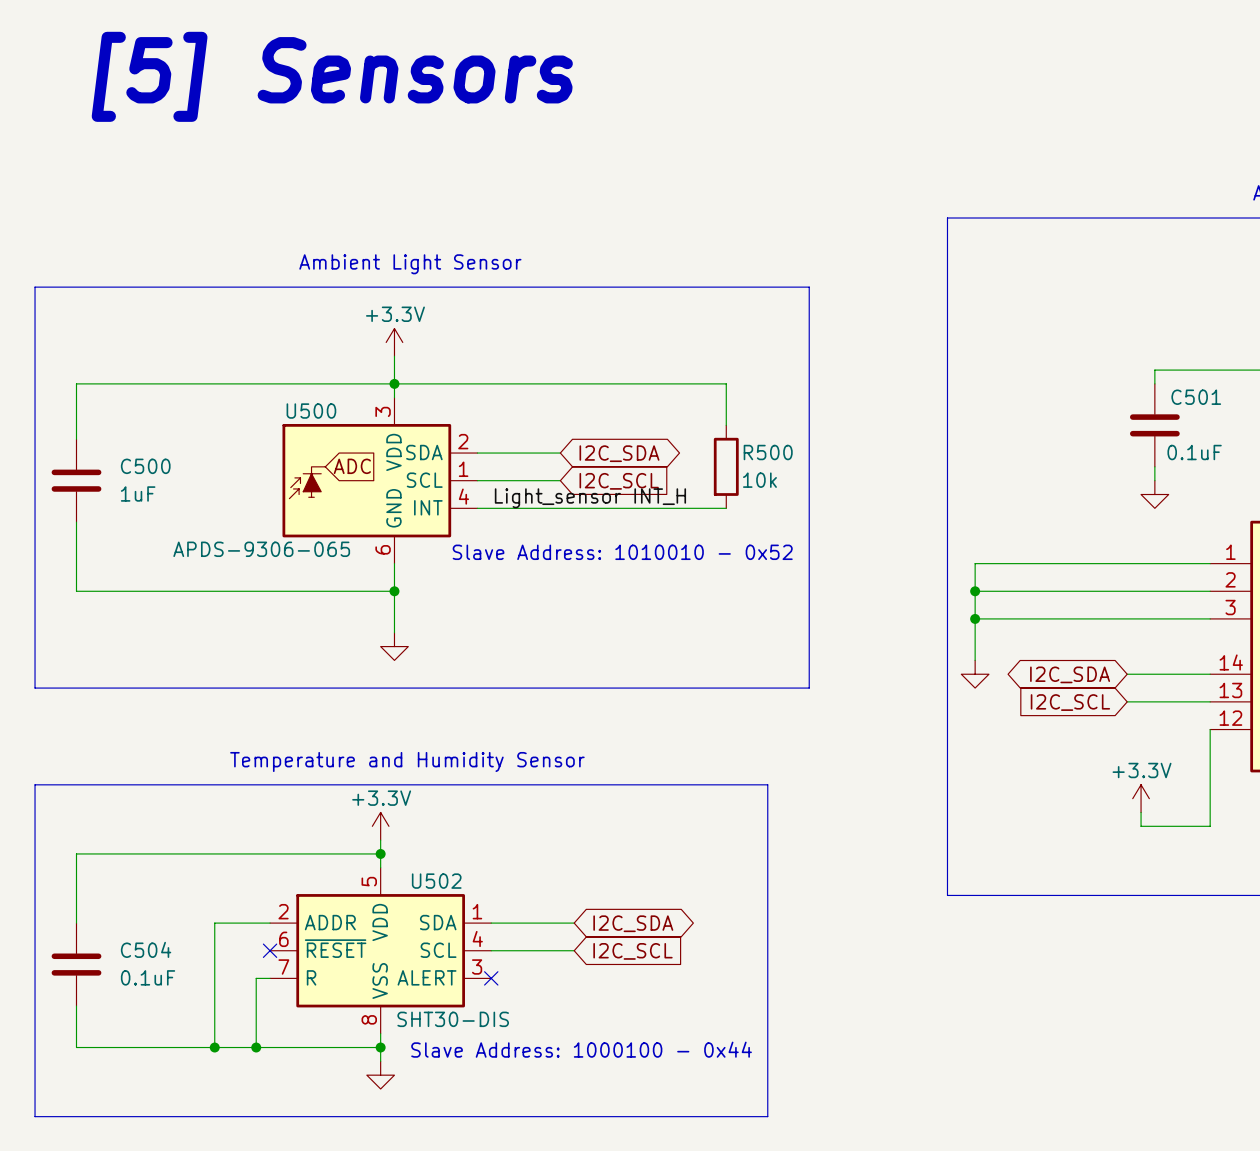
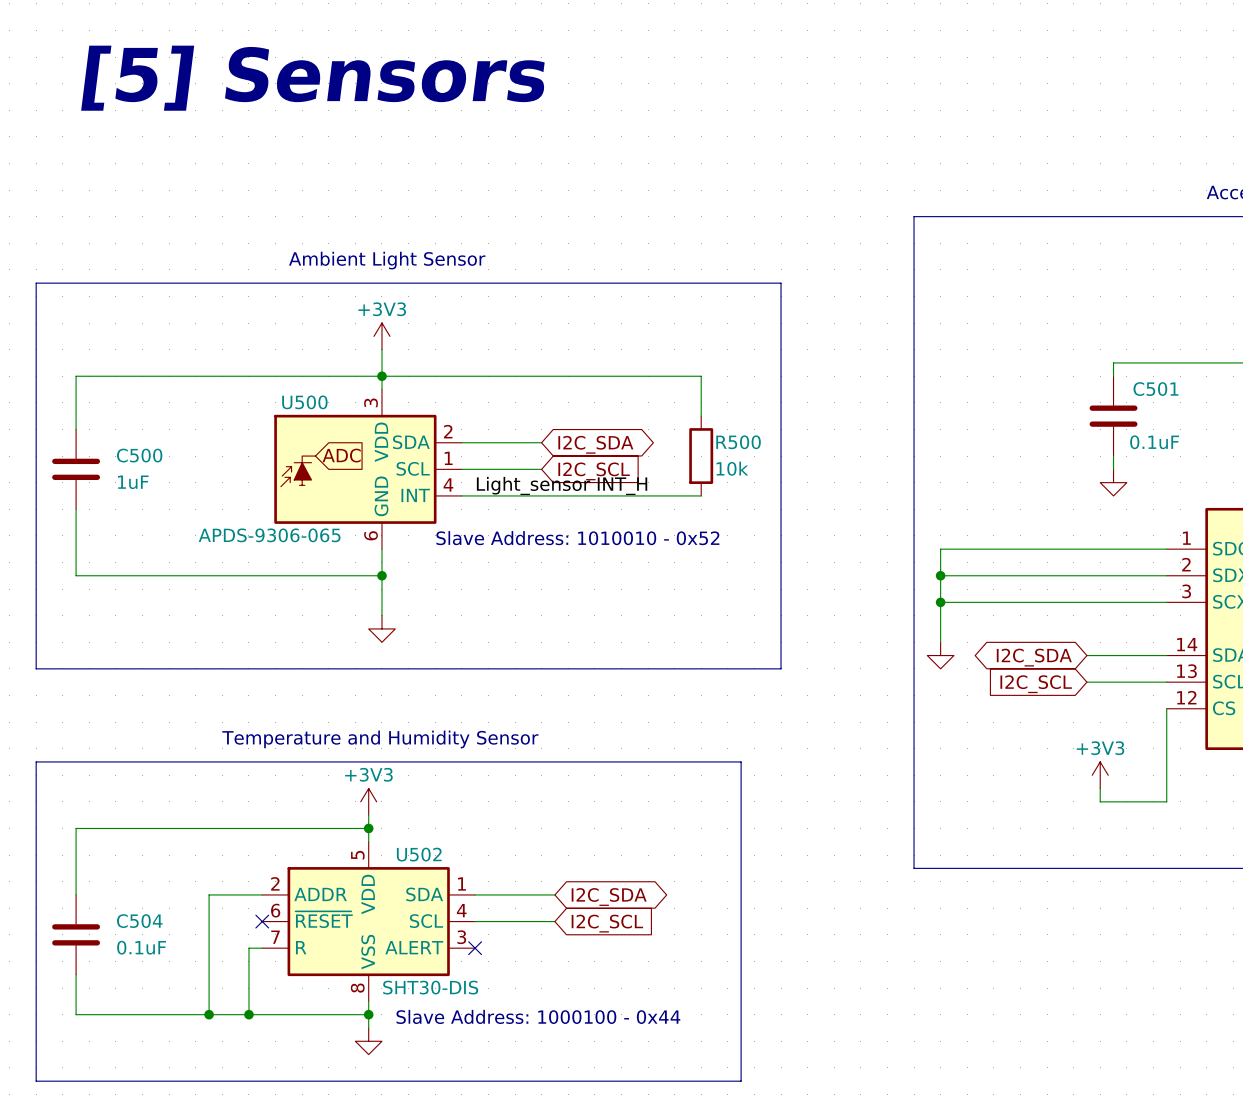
power symbol: +3.3V (394, 342) -> +3V3 (381, 336)
power symbol: +3.3V (1141, 798) -> +3V3 (1100, 775)
power symbol: +3.3V (380, 826) -> +3V3 (368, 801)

